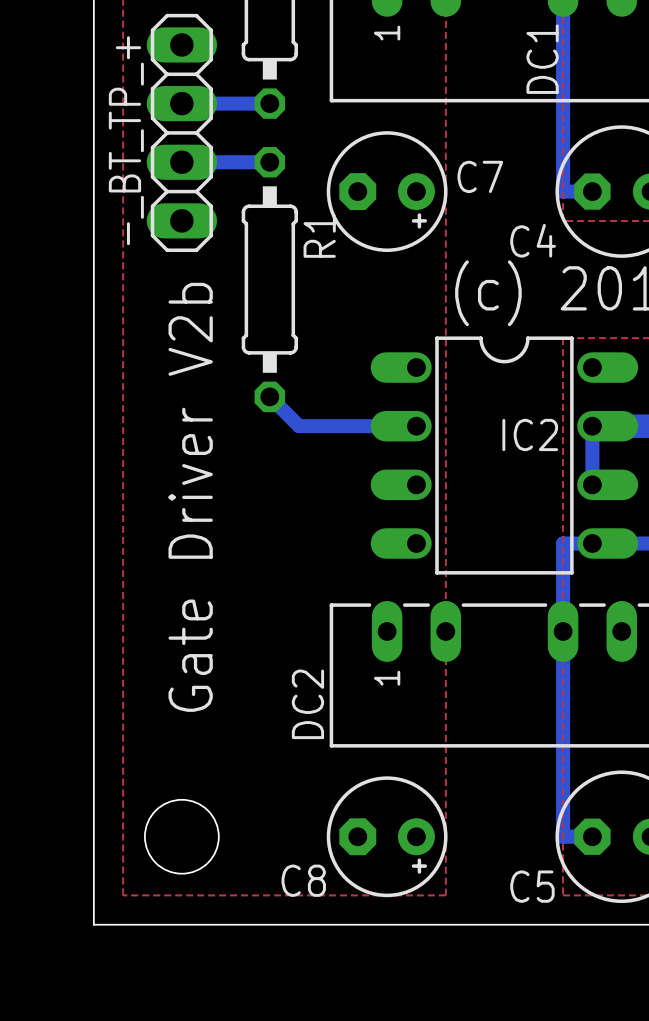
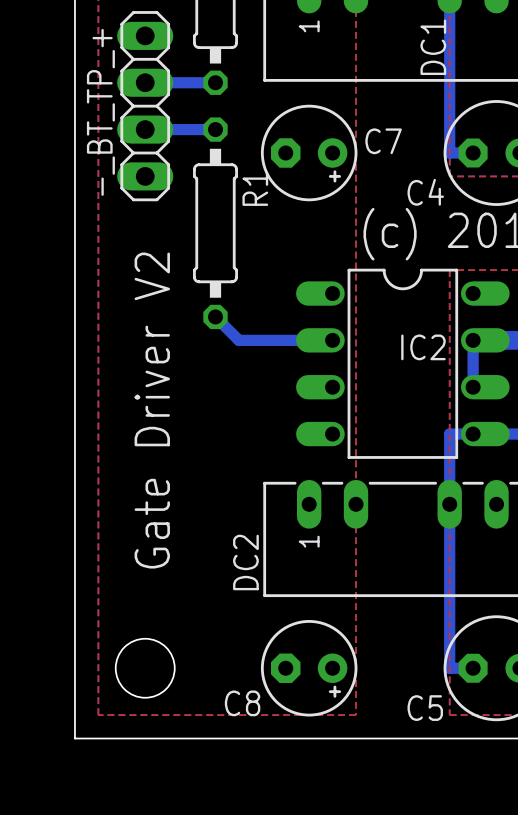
text: Gate Driver V2b (190, 497) -> Gate Driver V2 (152, 410)

